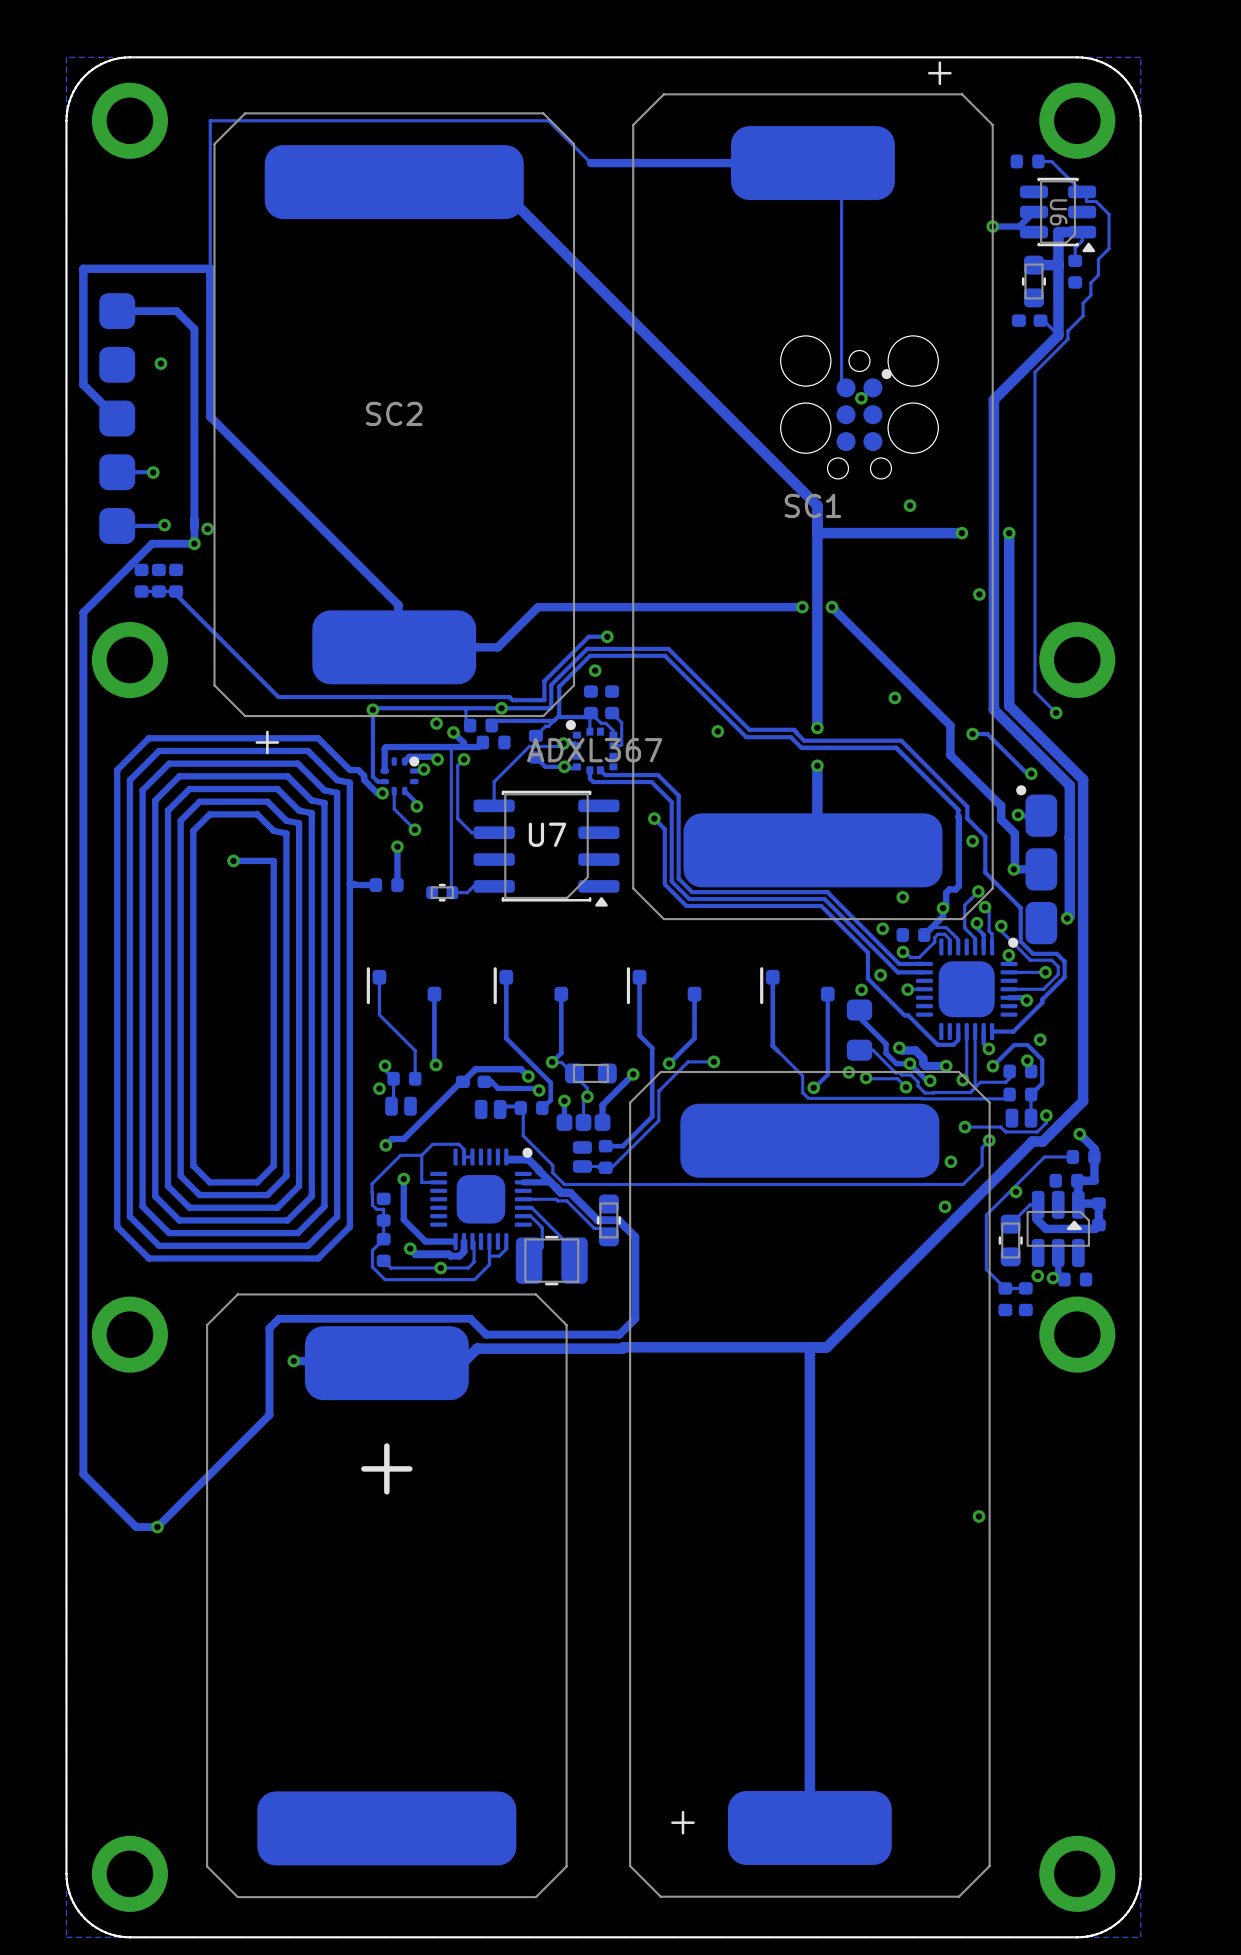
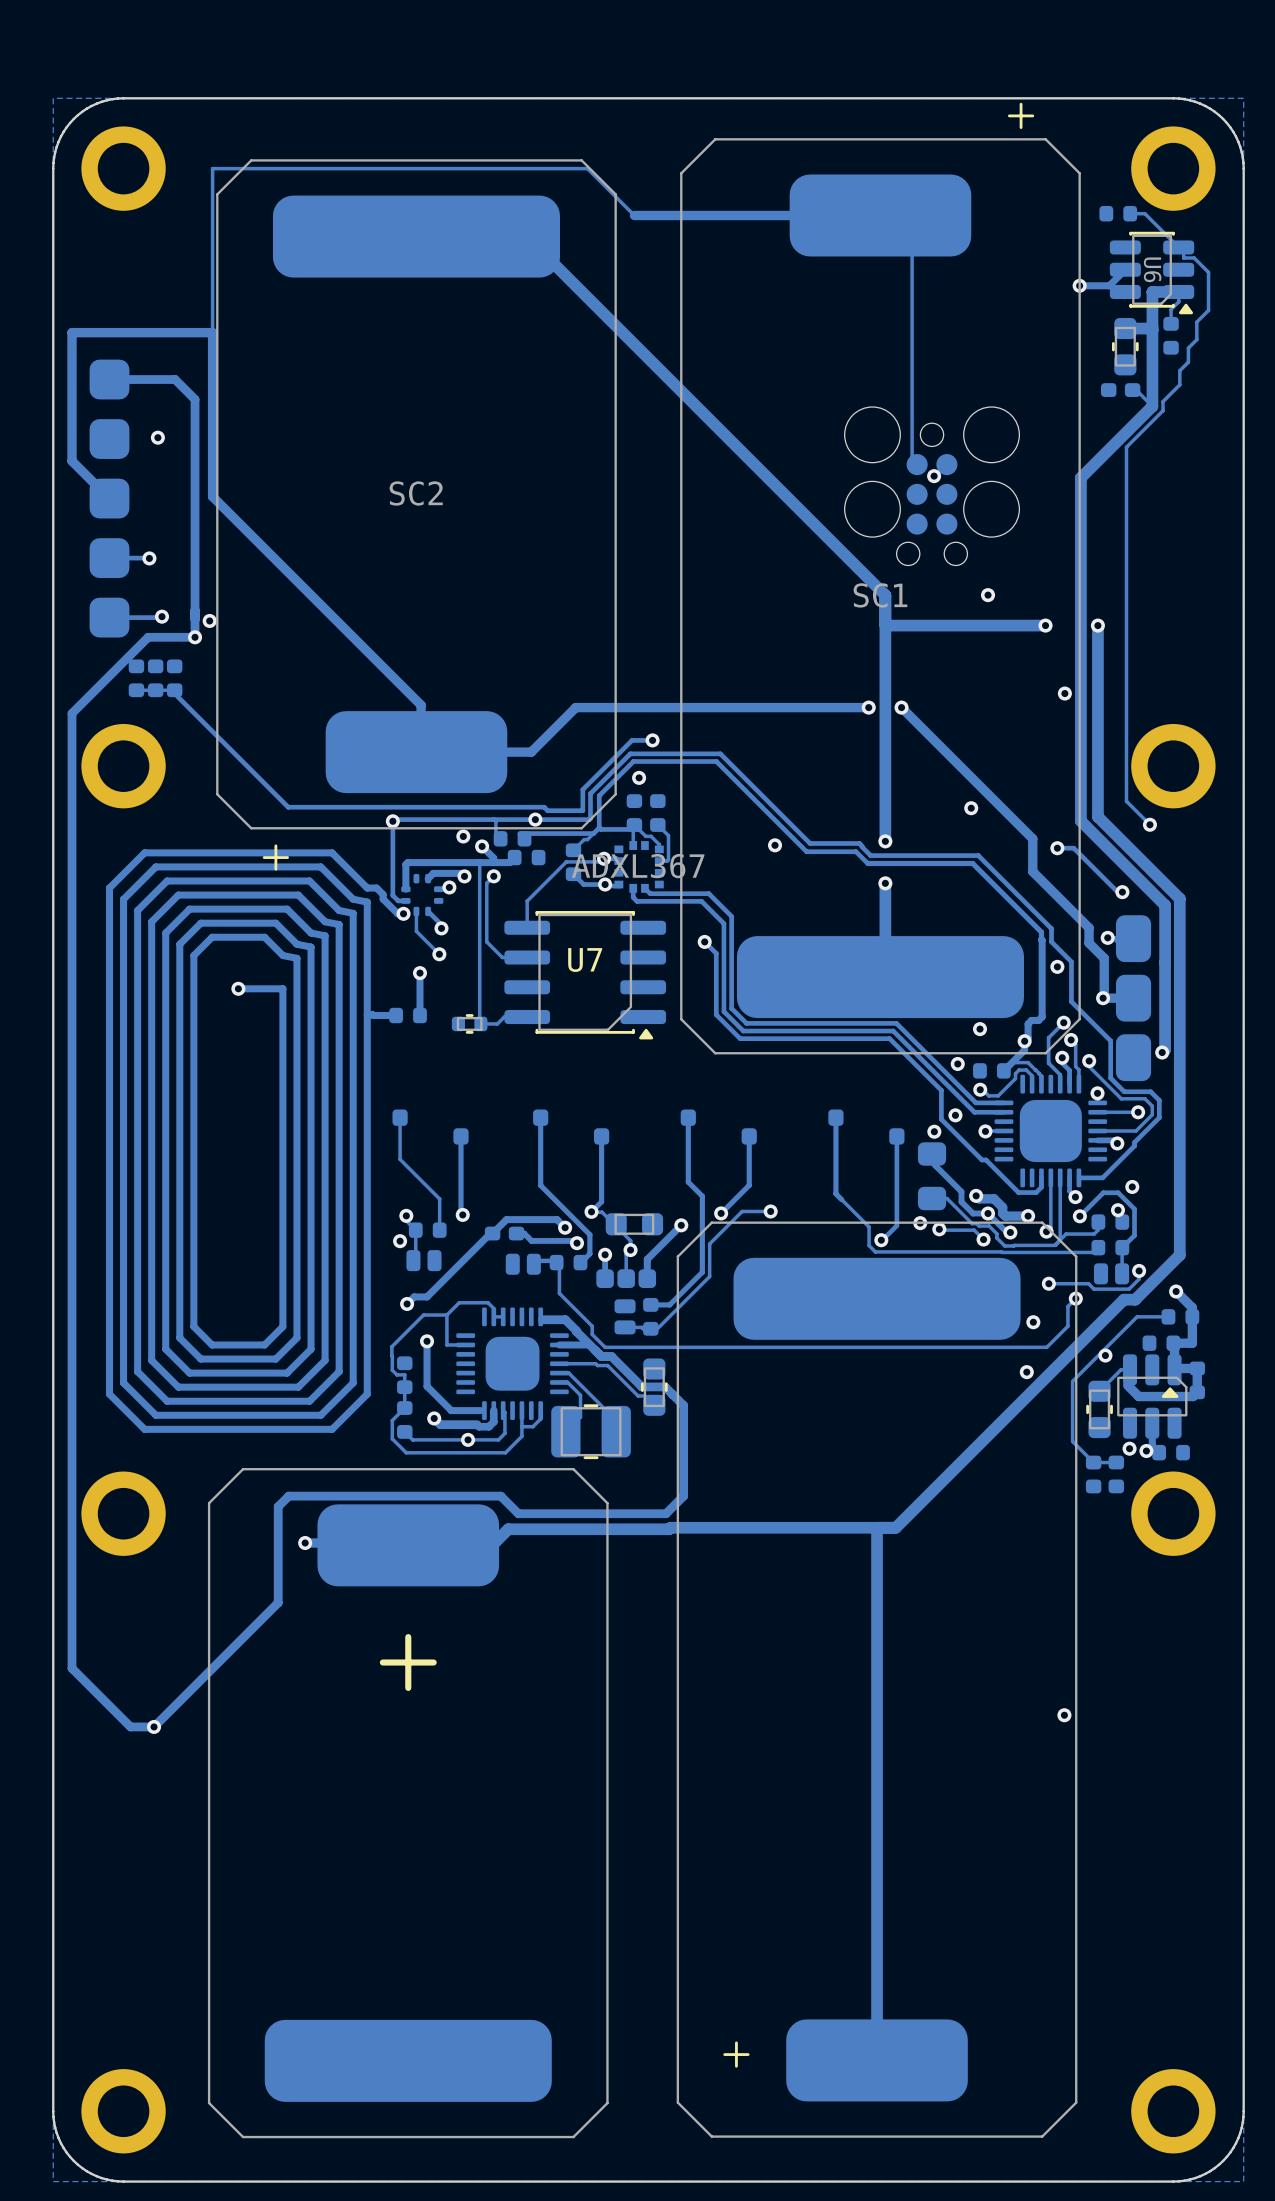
part footprint: [836, 369, 892, 452] -> [906, 454, 958, 535]
part footprint: [565, 719, 618, 775] -> [614, 841, 664, 893]
part footprint: [380, 756, 420, 796] -> [401, 873, 444, 917]
part footprint: [1016, 785, 1058, 945] -> [1115, 915, 1152, 1082]
part footprint: [915, 937, 1019, 1041] -> [994, 1074, 1108, 1188]
part footprint: [366, 967, 442, 1005] -> [392, 1109, 469, 1145]
part footprint: [493, 967, 569, 1005] -> [533, 1109, 610, 1145]
part footprint: [626, 967, 702, 1005] -> [680, 1109, 757, 1145]
part footprint: [760, 967, 835, 1005] -> [828, 1109, 905, 1145]
part footprint: [430, 1147, 533, 1251] -> [456, 1307, 569, 1420]

